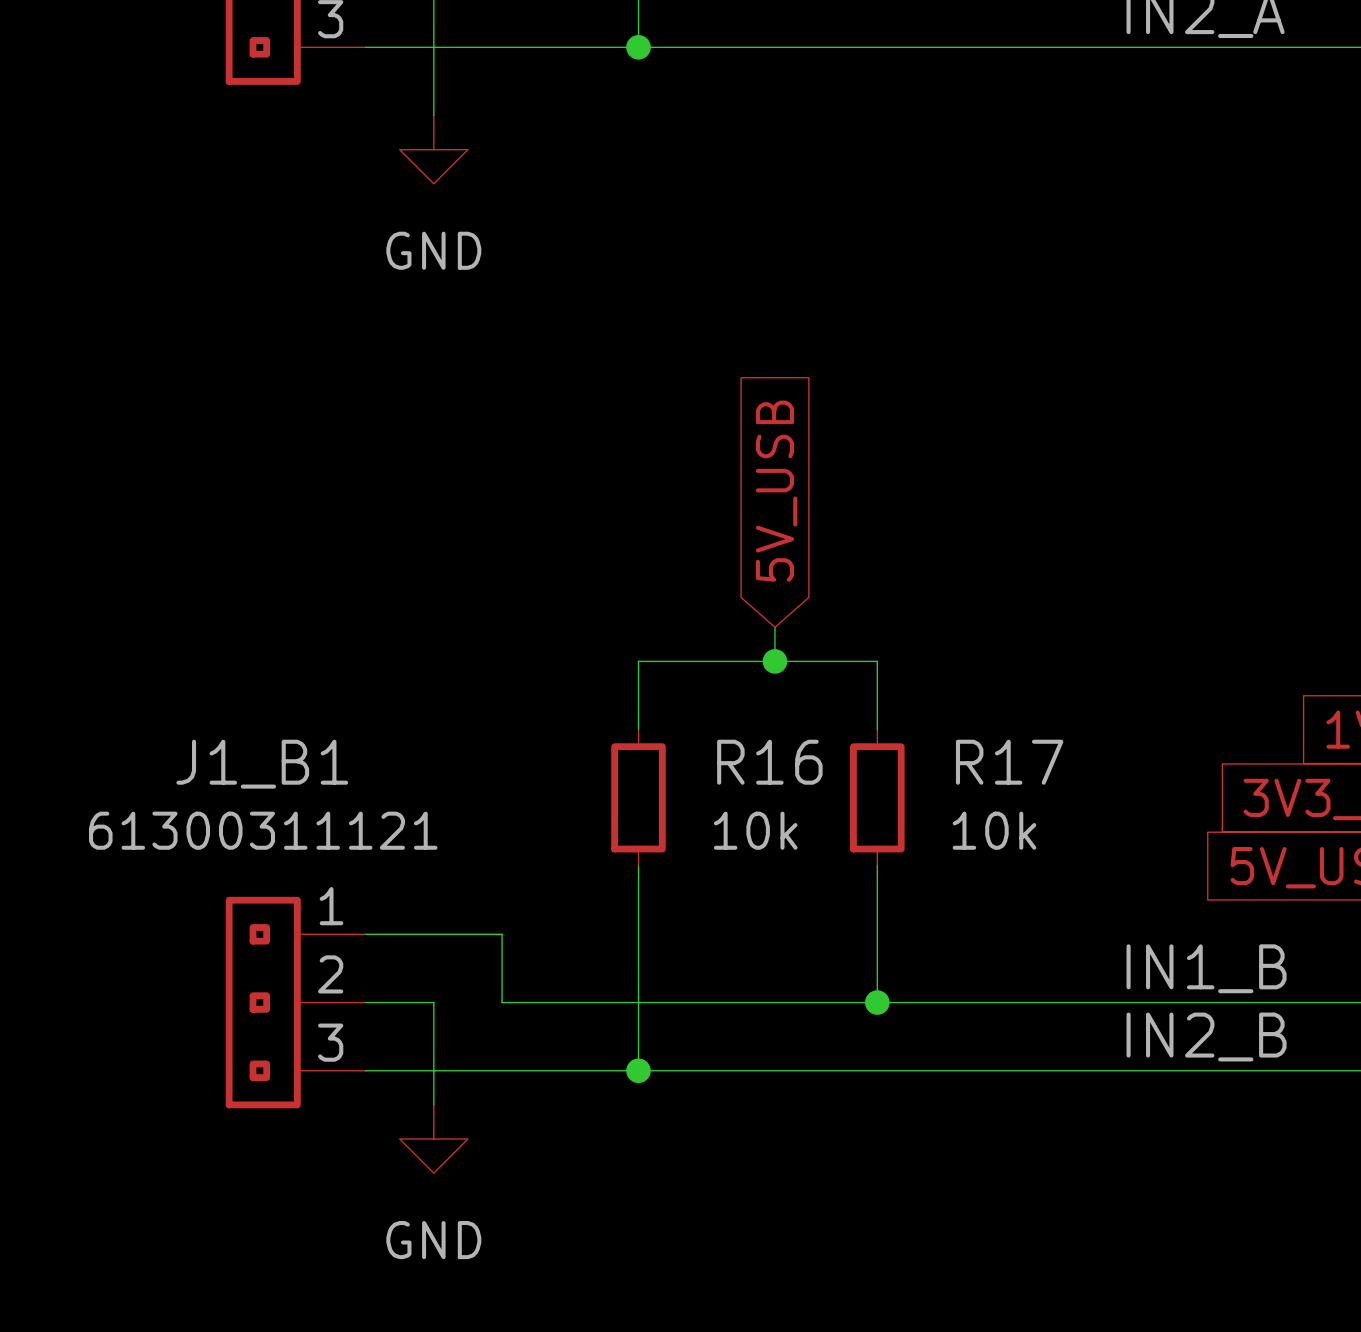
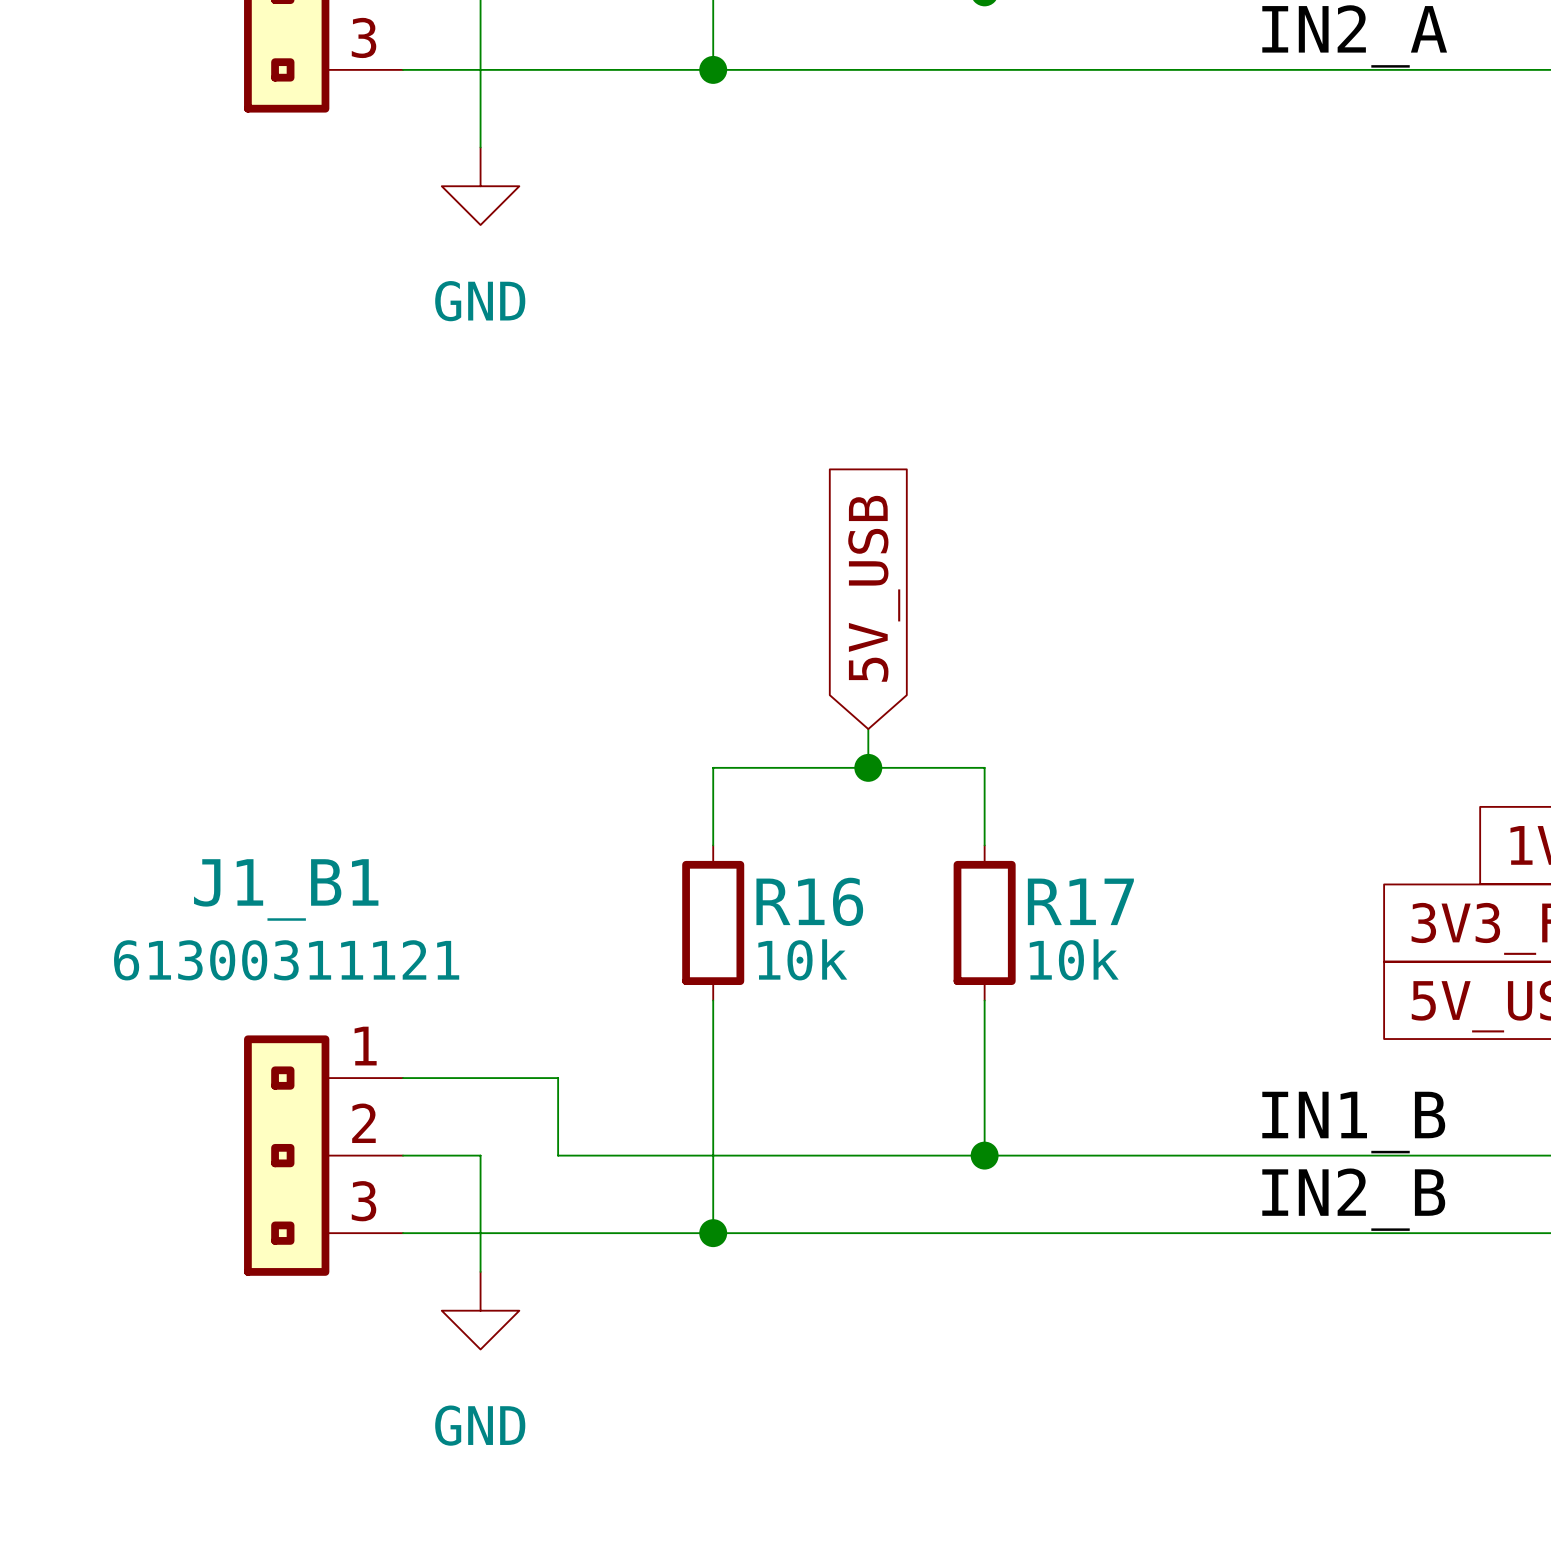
R16 name position: R16 (769, 762) -> R16 (809, 901)
R17 name position: R17 (1009, 762) -> R17 (1080, 901)
R16 text position: 10k (755, 830) -> 10k (802, 959)
R17 text position: 10k (994, 830) -> 10k (1074, 959)

